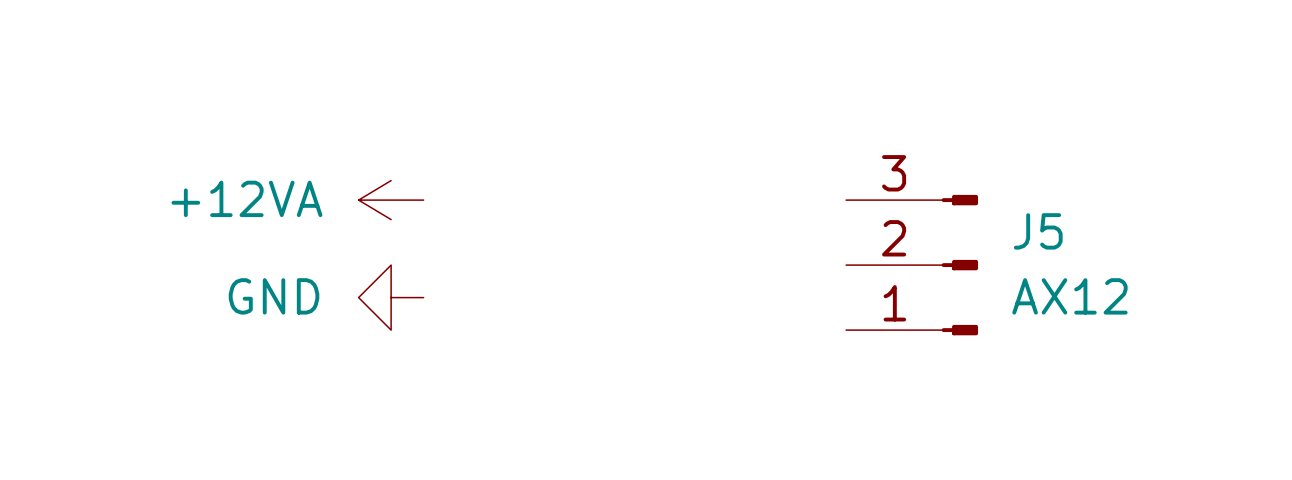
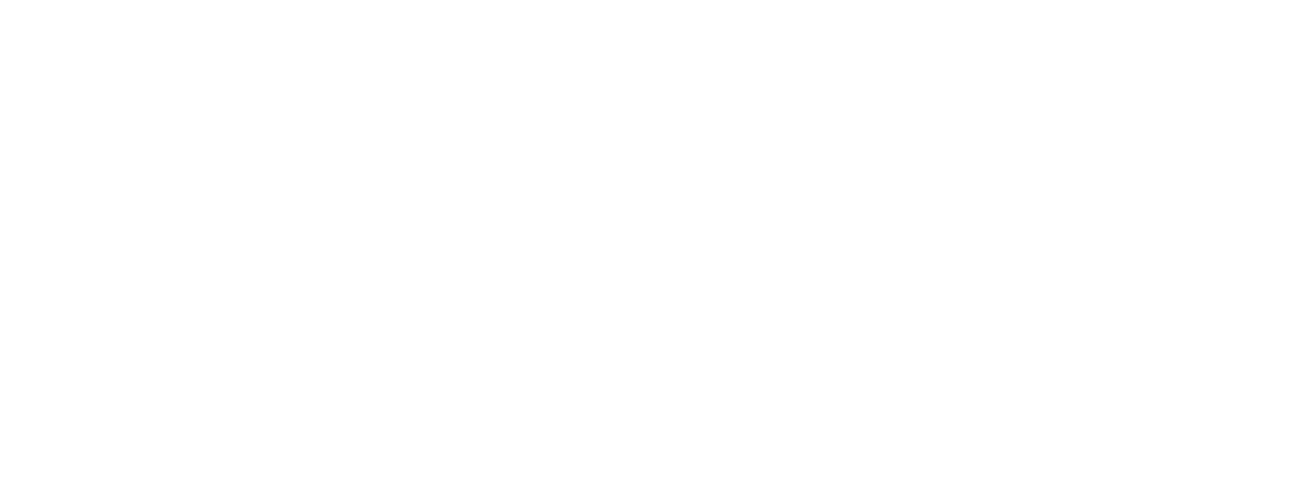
power symbol: +12VA (391, 200) -> none
J5: AX12 (912, 265) -> none
power symbol: GND (391, 297) -> none

